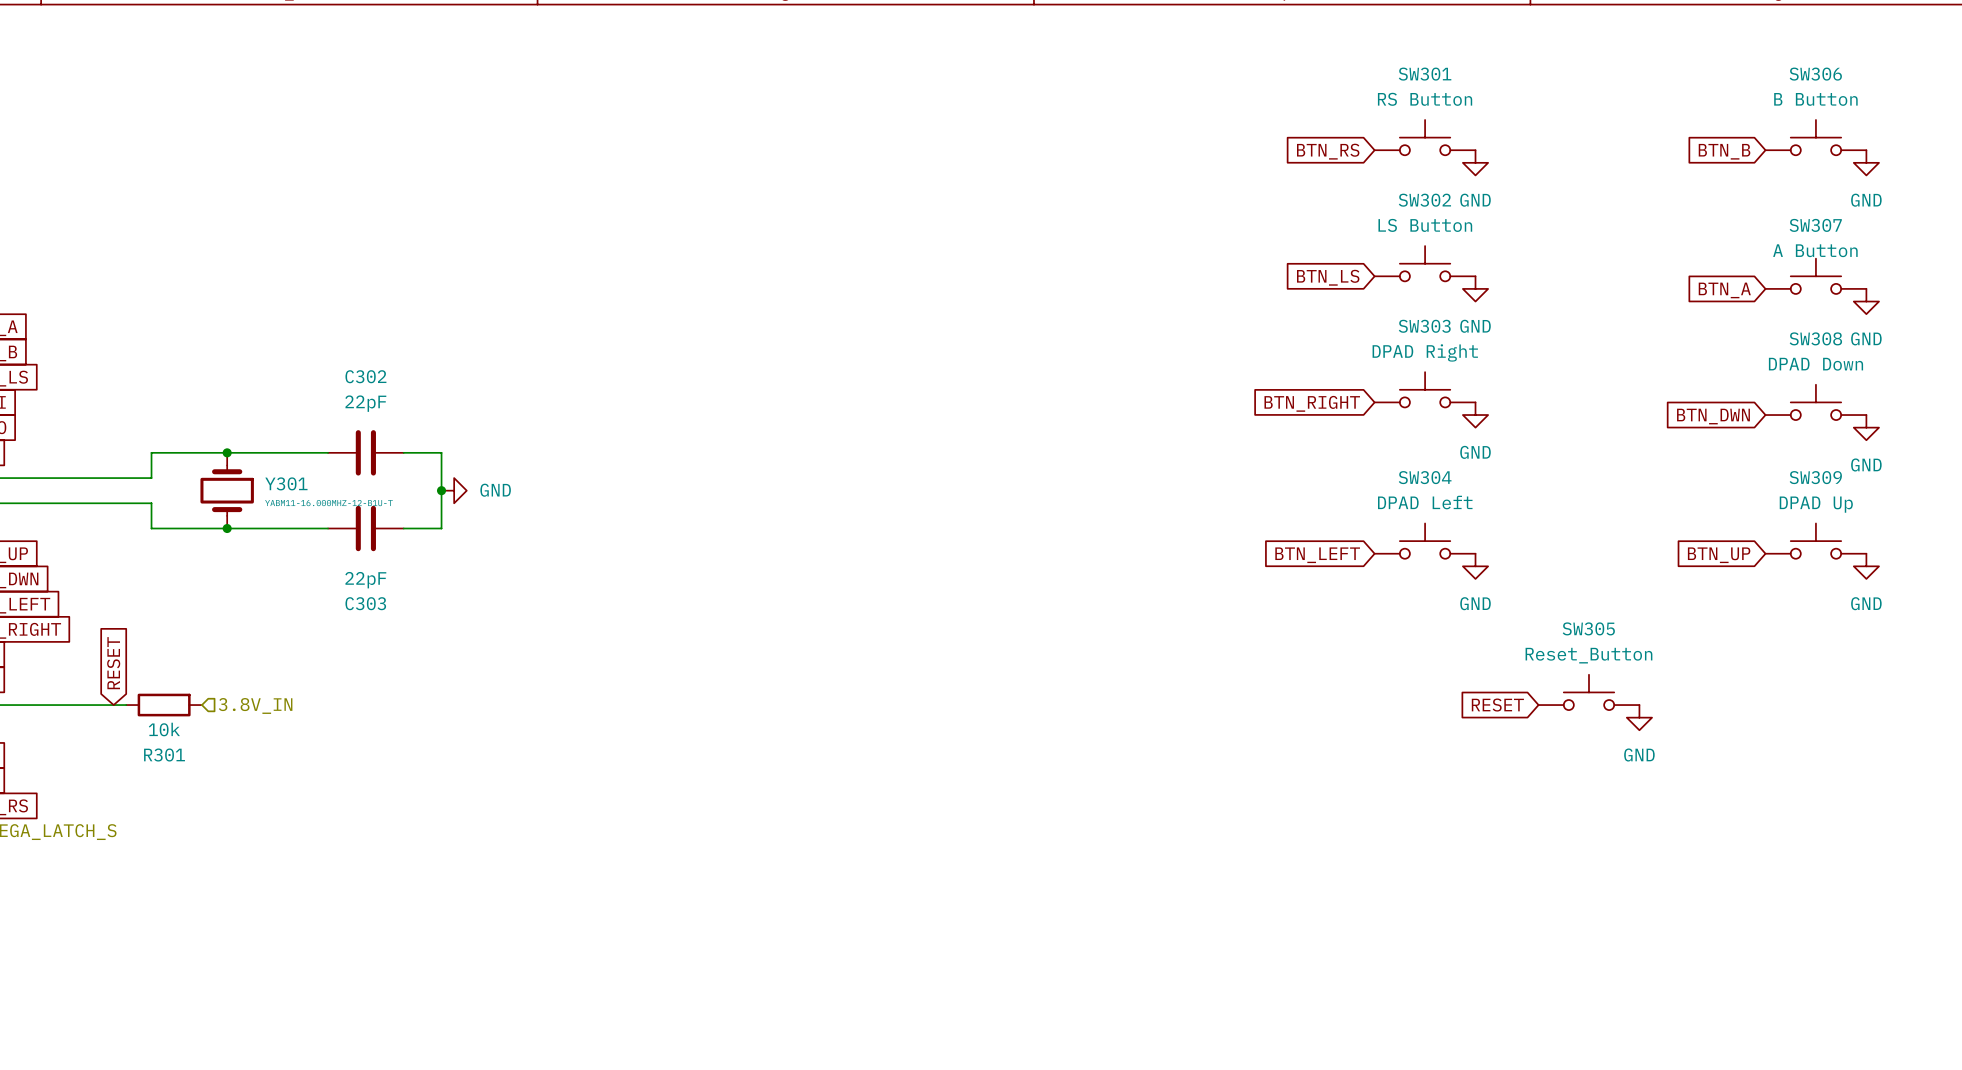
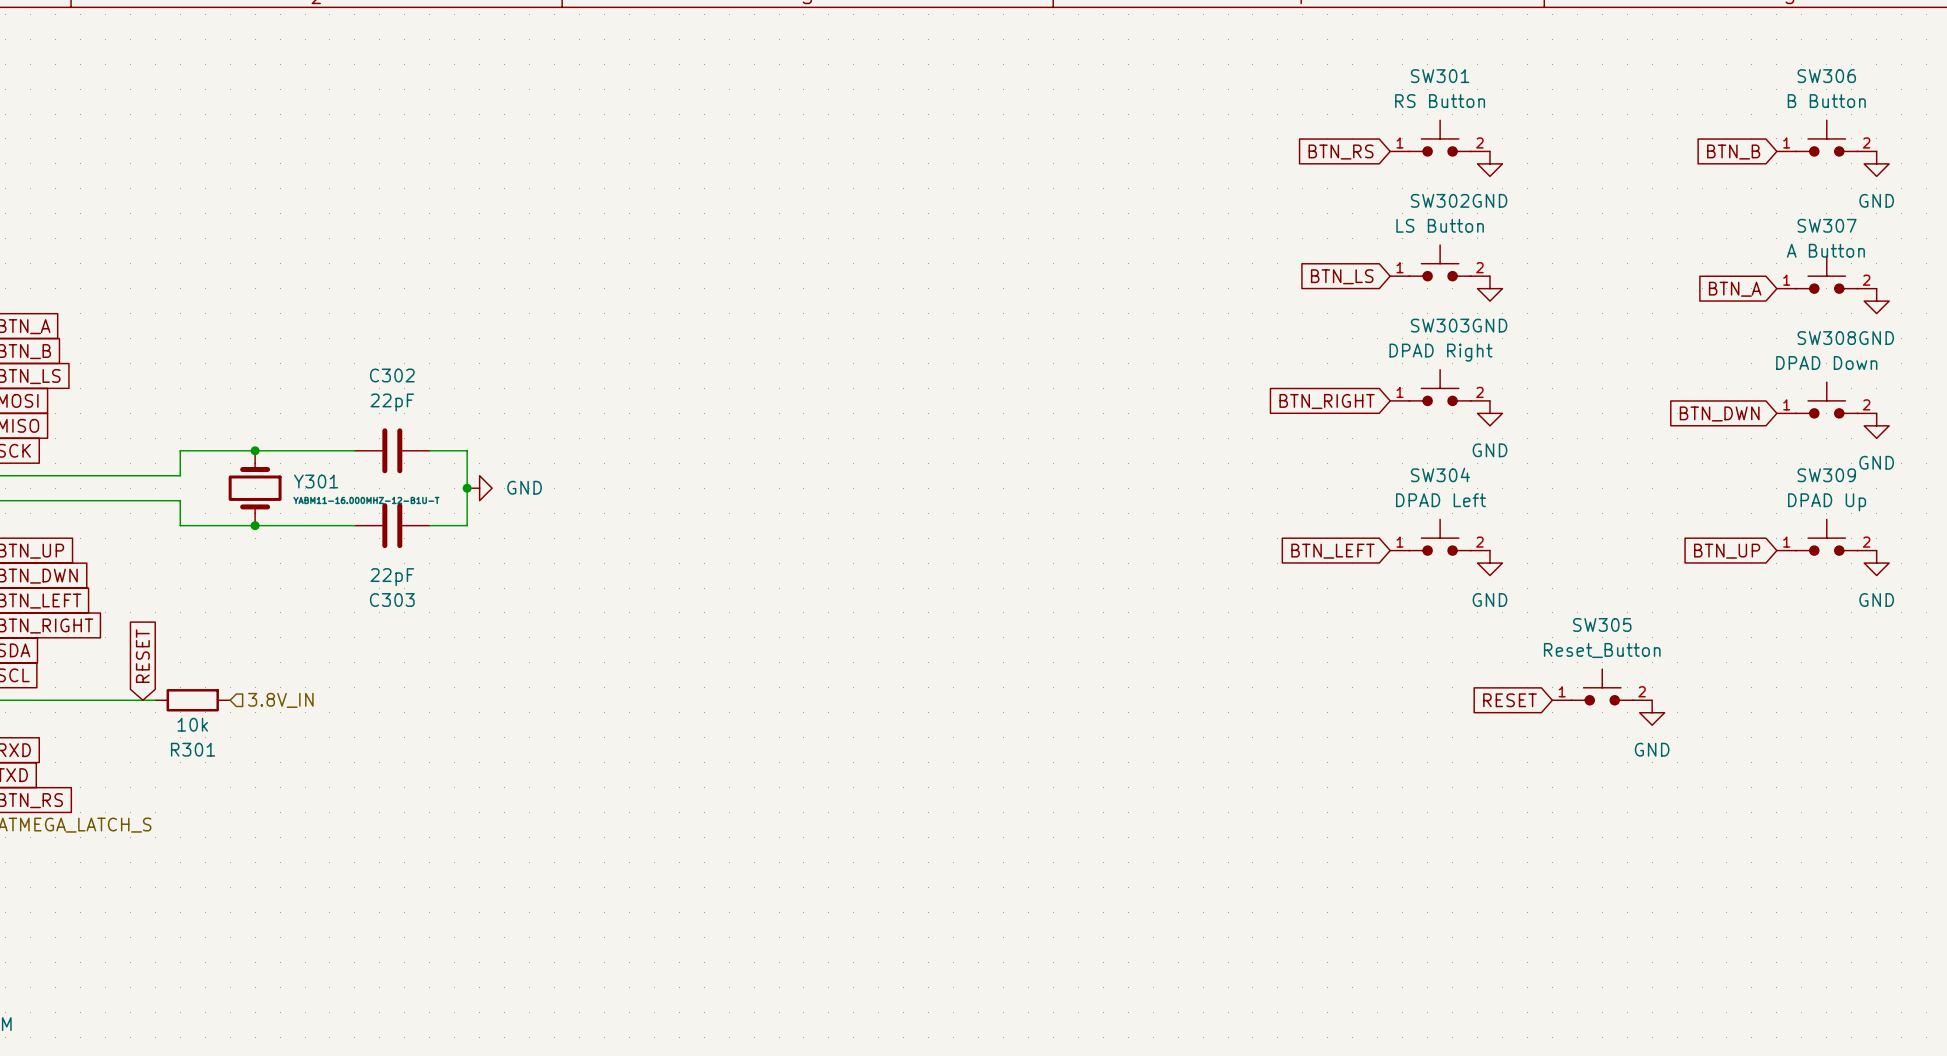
SW301 symbol: [1374, 119, 1476, 156] -> [1390, 120, 1490, 156]
SW306 symbol: [1765, 119, 1867, 156] -> [1776, 120, 1877, 156]
SW302 symbol: [1374, 246, 1476, 282] -> [1390, 244, 1490, 281]
SW307 symbol: [1765, 258, 1867, 294] -> [1776, 257, 1877, 294]
SW303 symbol: [1374, 372, 1476, 408] -> [1390, 369, 1490, 406]
SW308 symbol: [1765, 384, 1867, 421] -> [1776, 382, 1877, 418]
SW304 symbol: [1374, 523, 1476, 559] -> [1390, 519, 1490, 556]
SW309 symbol: [1765, 523, 1867, 559] -> [1776, 519, 1877, 556]
SW305 symbol: [1538, 674, 1640, 711] -> [1552, 669, 1653, 705]

